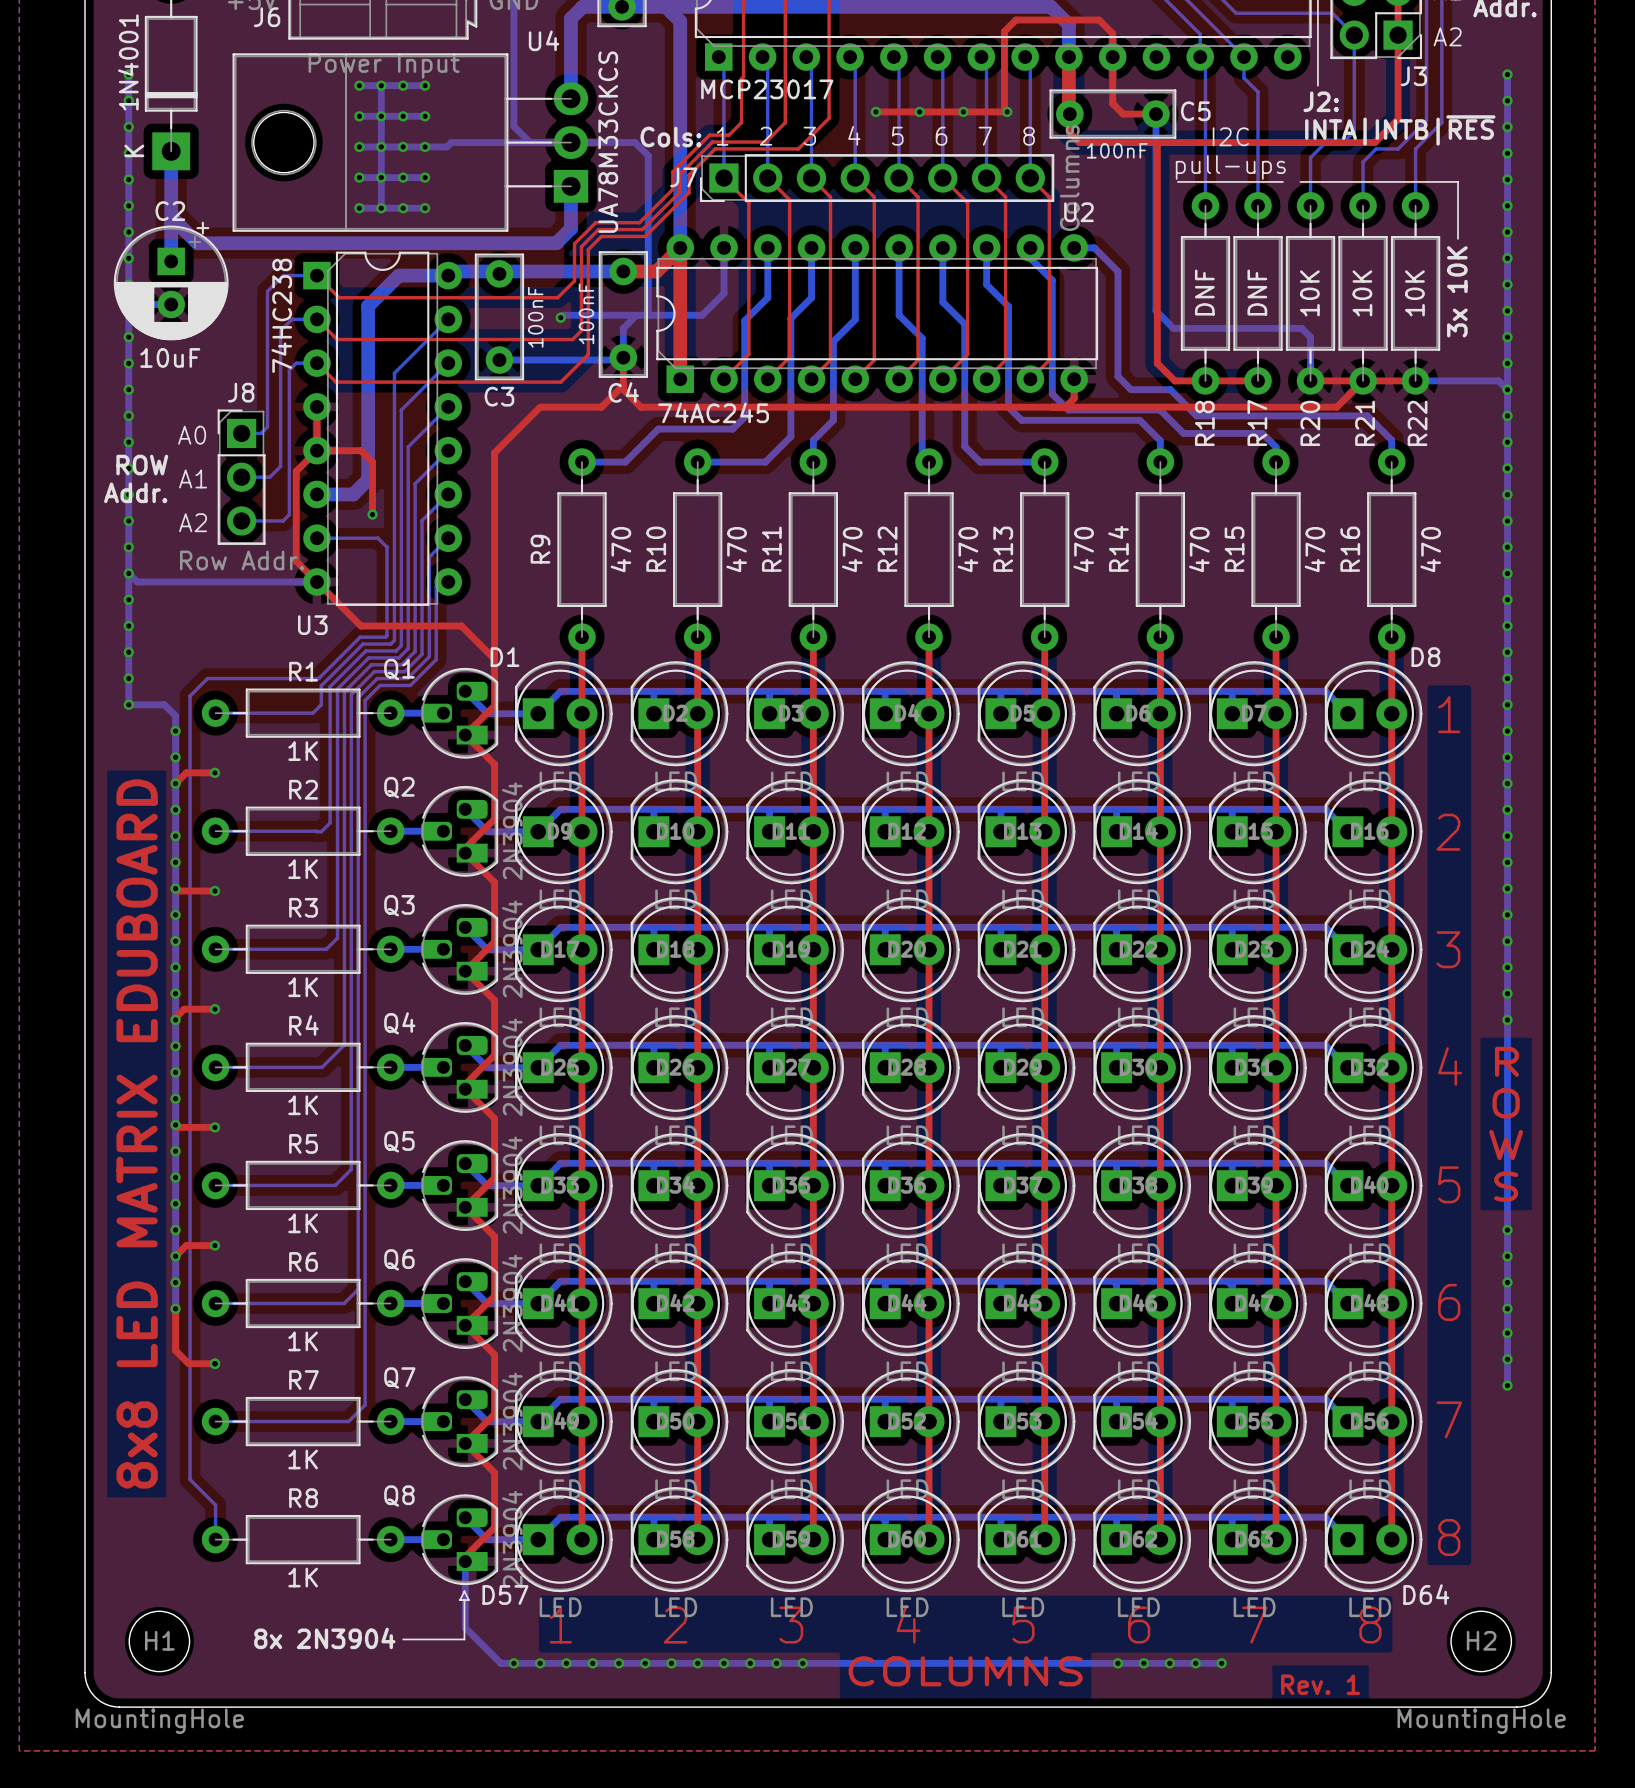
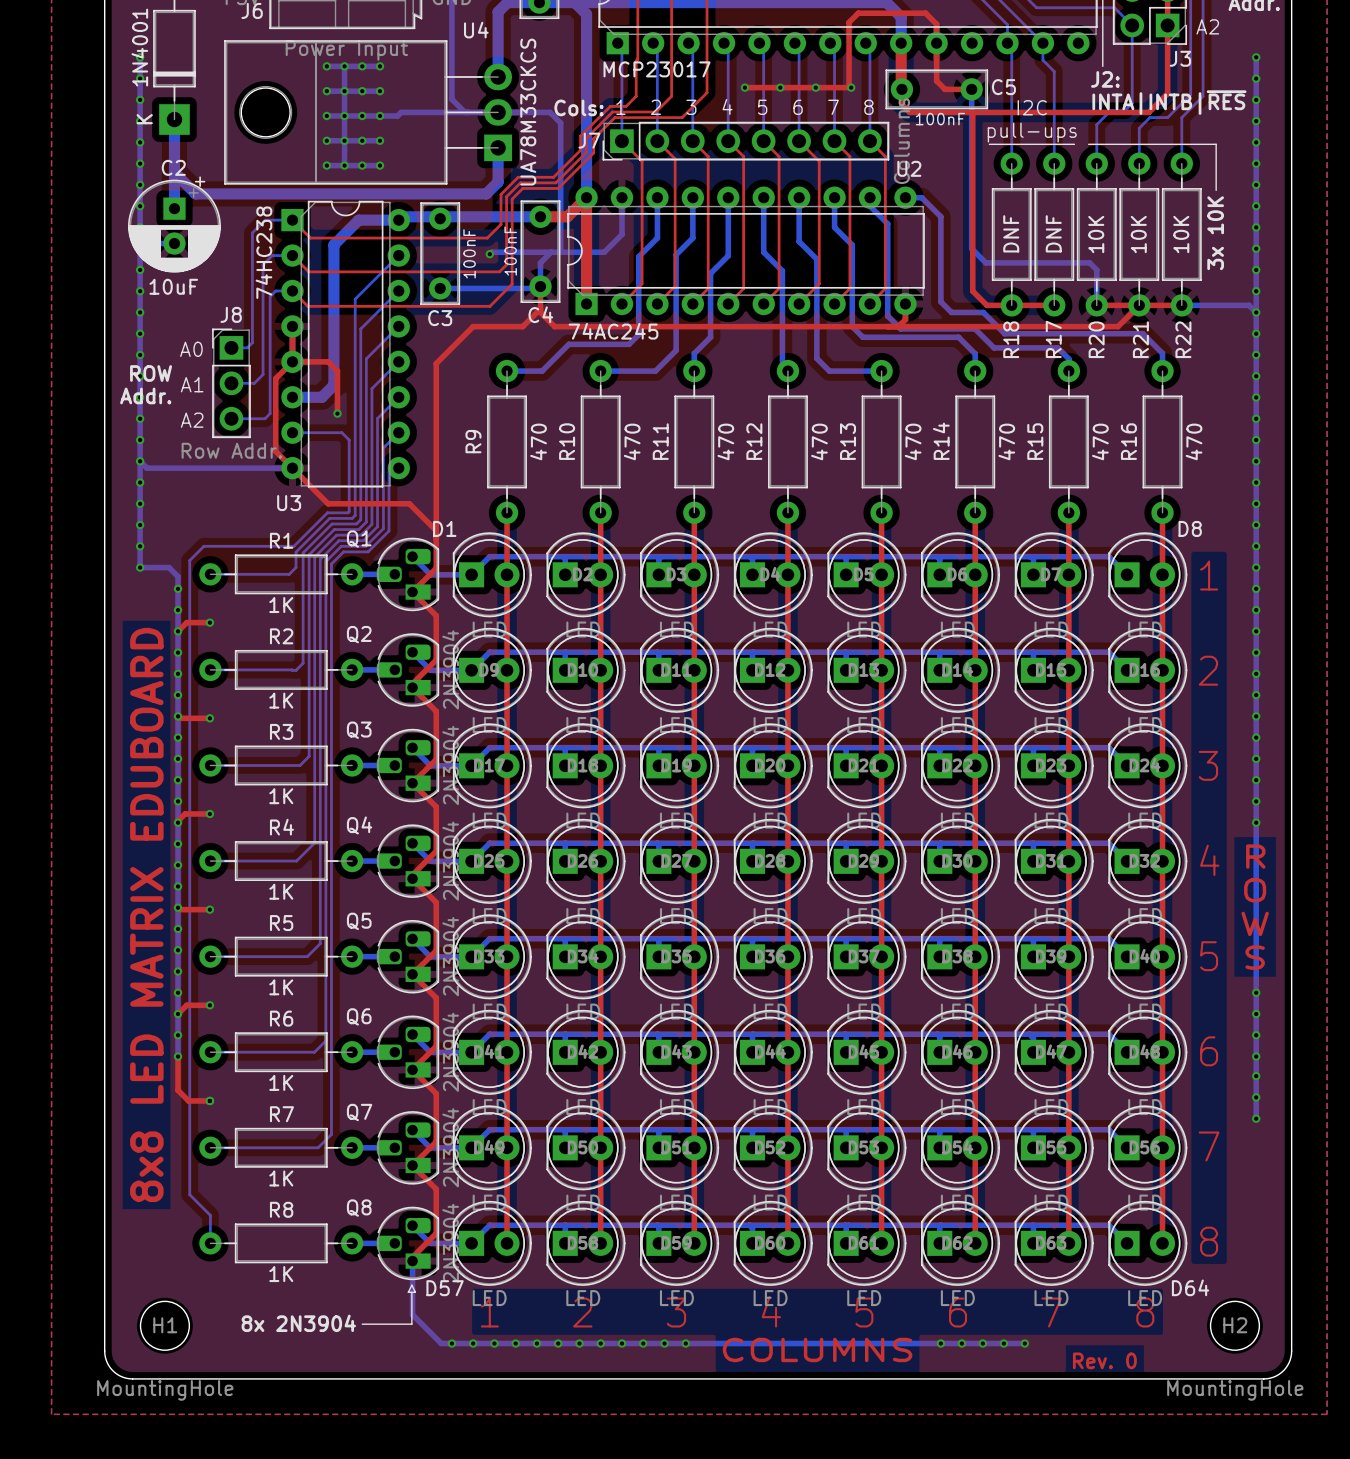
text: Rev. 1 (1320, 1684) -> Rev. 0 (1104, 1360)

